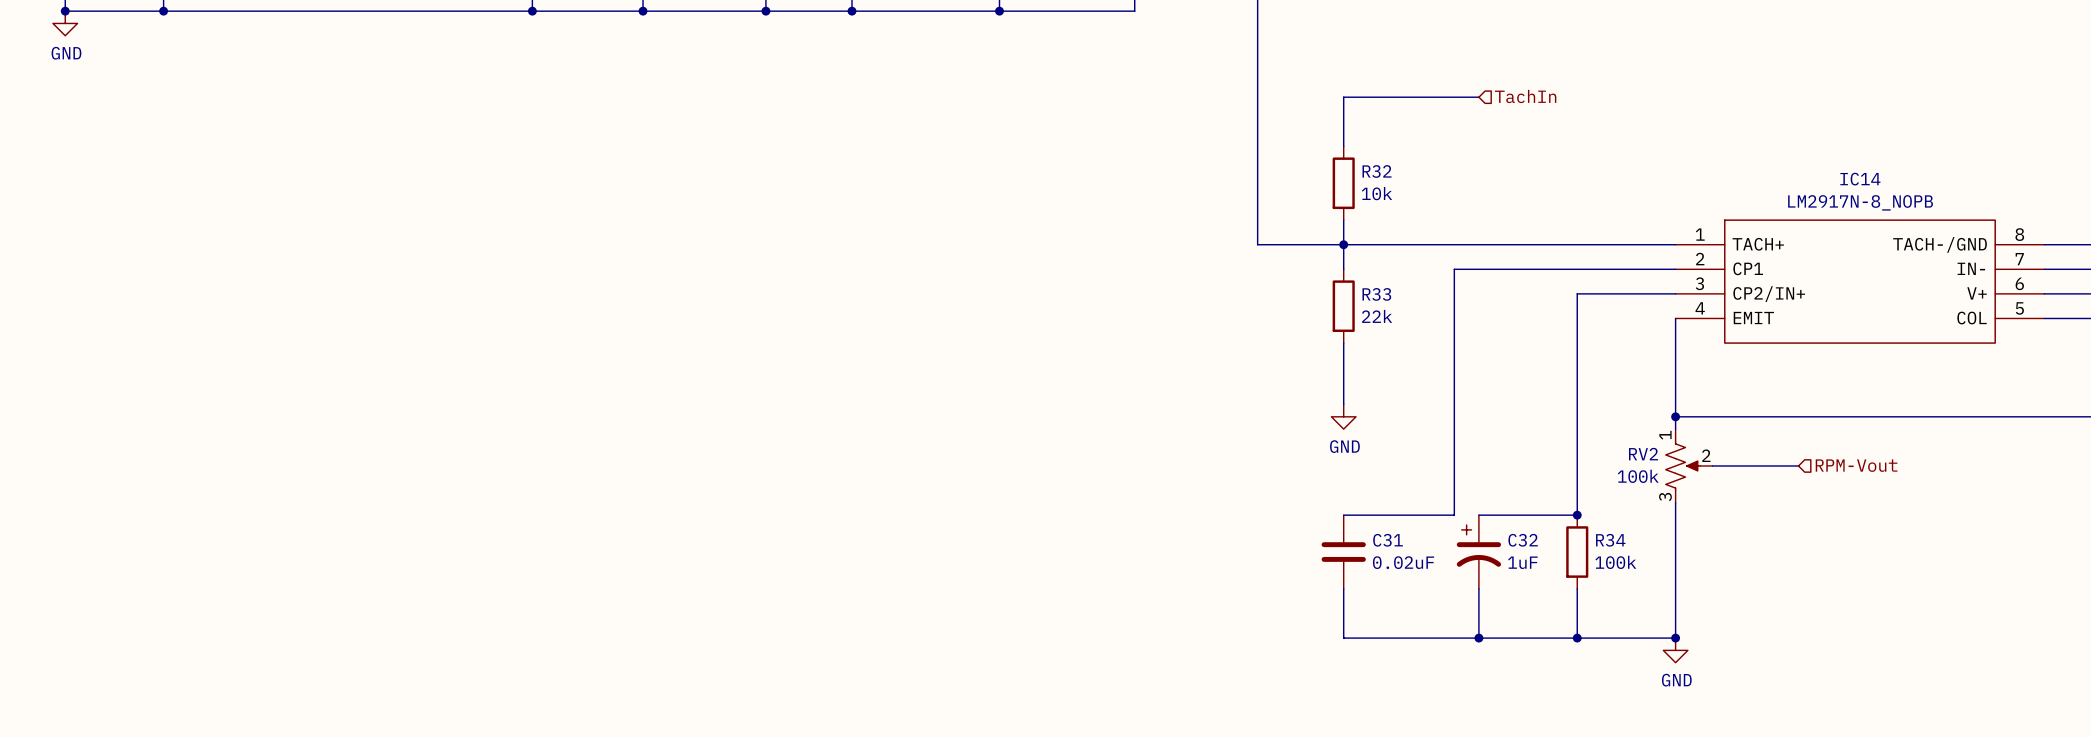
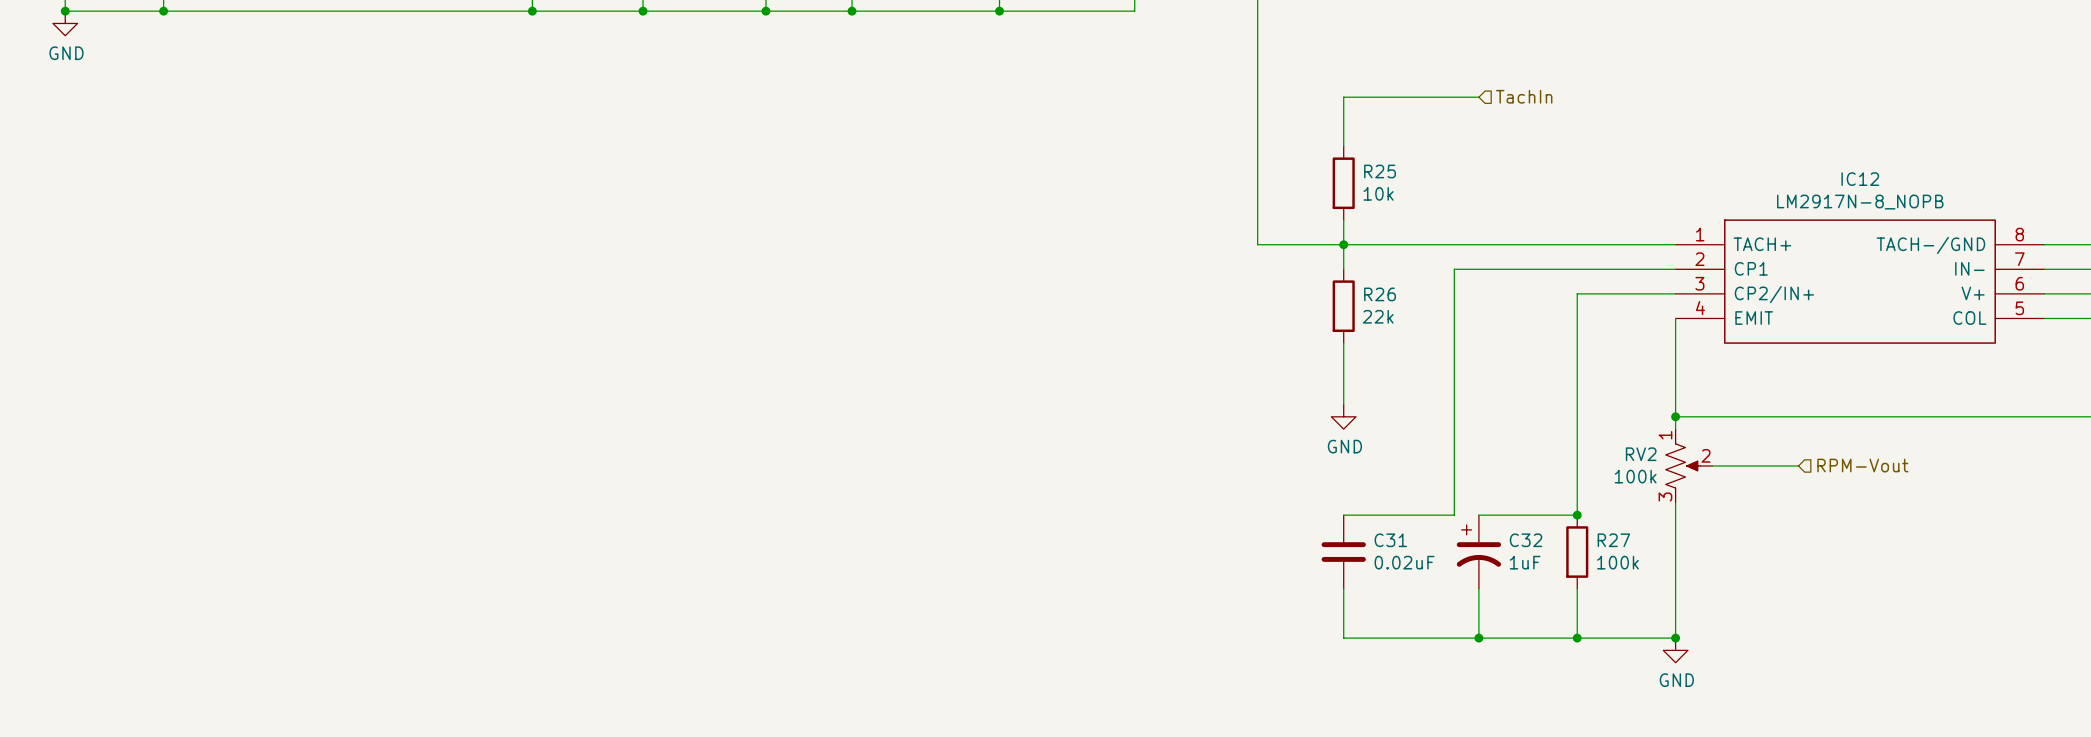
R32 name: R32 (1377, 171) -> R25 (1380, 171)
IC14 name: IC14 (1860, 179) -> IC12 (1860, 179)
R33 name: R33 (1376, 294) -> R26 (1380, 294)
R34 name: R34 (1610, 540) -> R27 (1613, 540)

